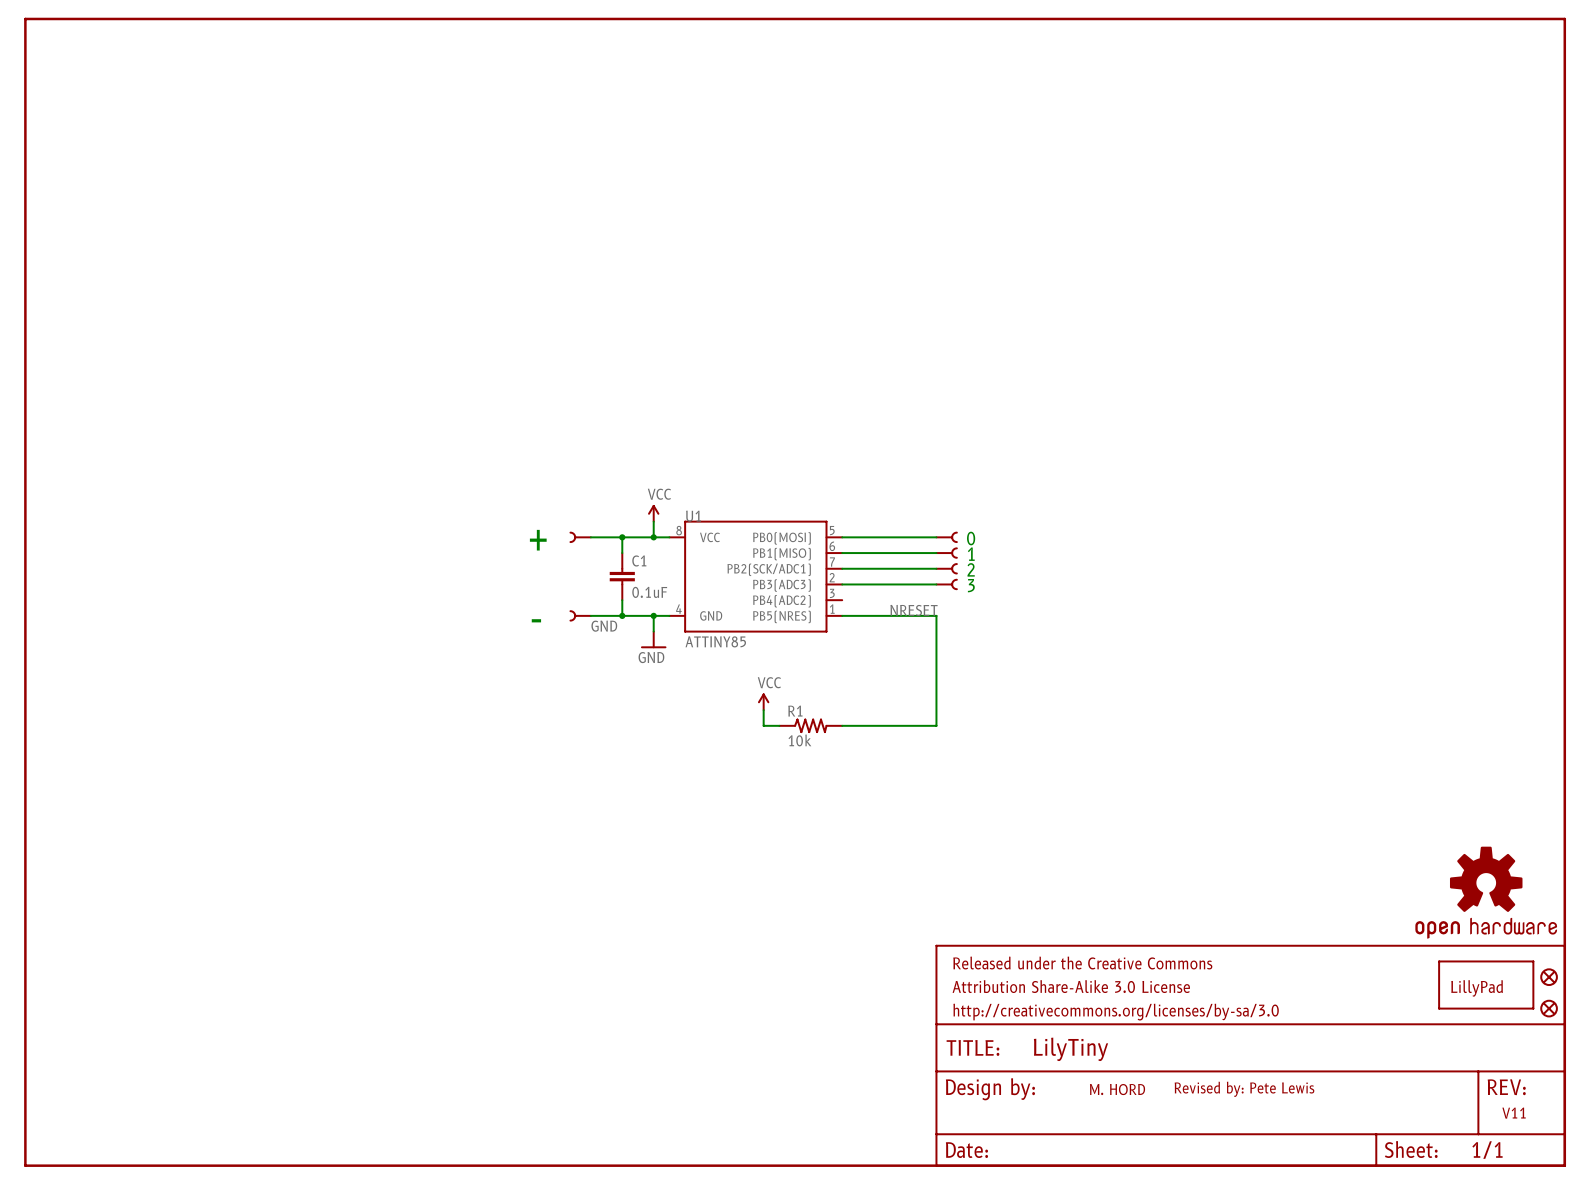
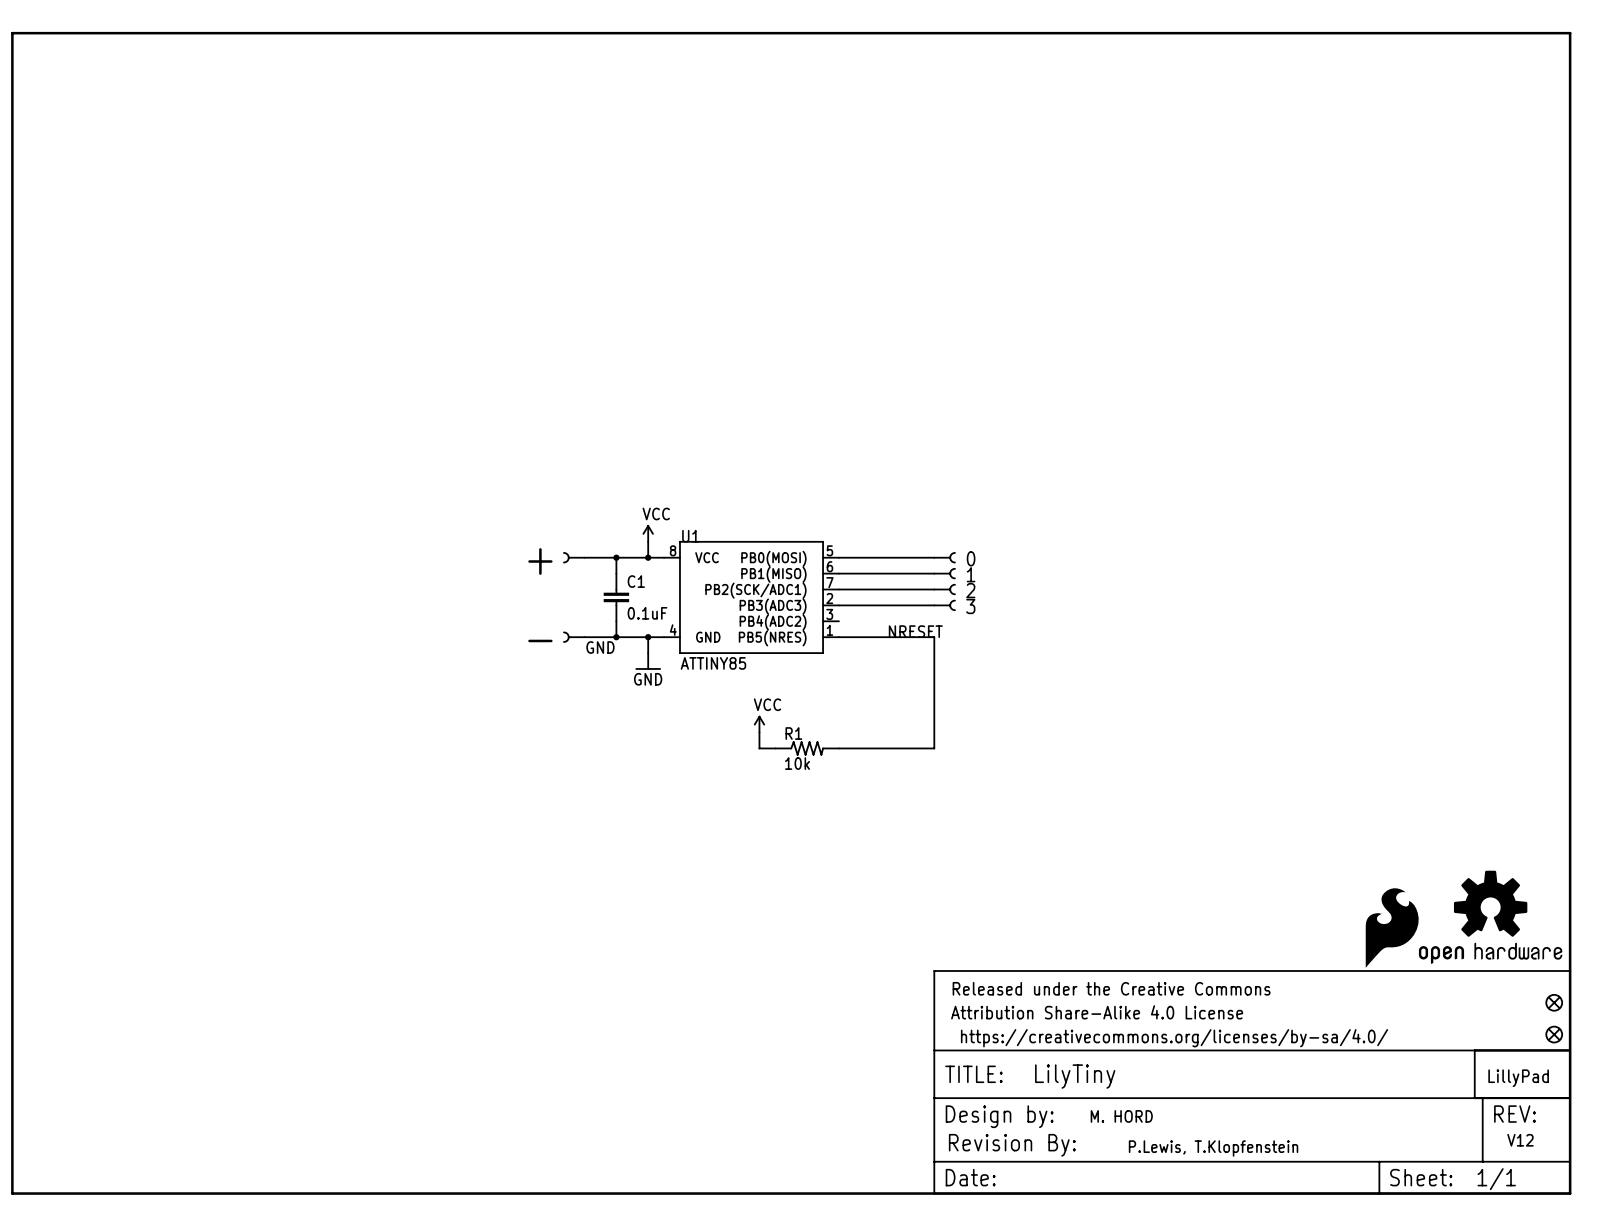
part: none -> (1392, 928)
part position: (1486, 985) -> (1522, 1074)
part text: Attribution Share-Alike 3.0 License (1071, 986) -> Attribution Share-Alike 4.0 License (1097, 1012)
part text: http://creativecommons.org/licenses/by-sa/3.0 (1116, 1012) -> https://creativecommons.org/licenses/by-sa/4.0/ (1174, 1038)
text: Revised by: Pete Lewis (1244, 1089) -> none
text: V11 (1514, 1113) -> V12 (1520, 1140)
part: none -> (1012, 1145)
text: none -> P.Lewis, T.Klopfenstein (1213, 1148)

